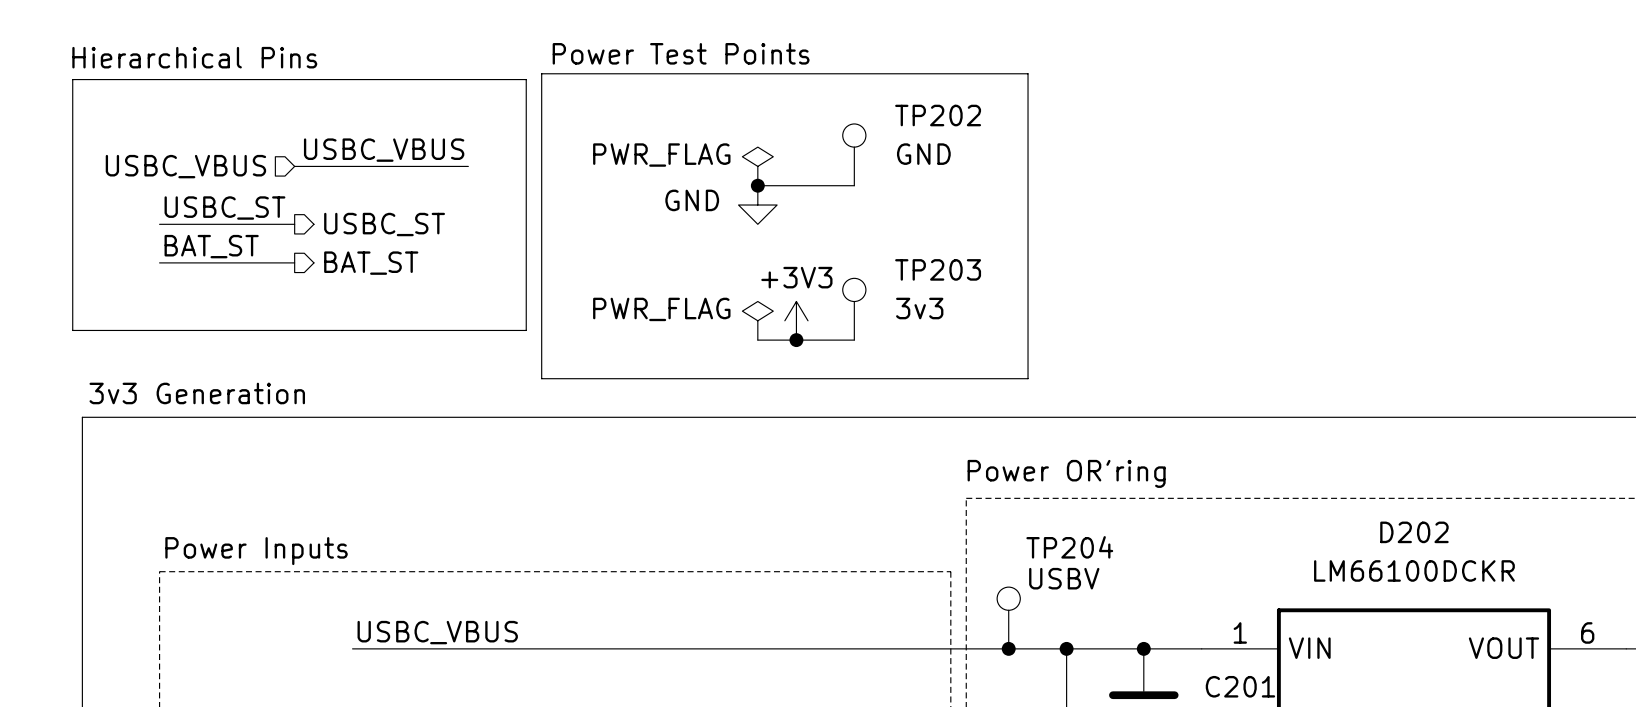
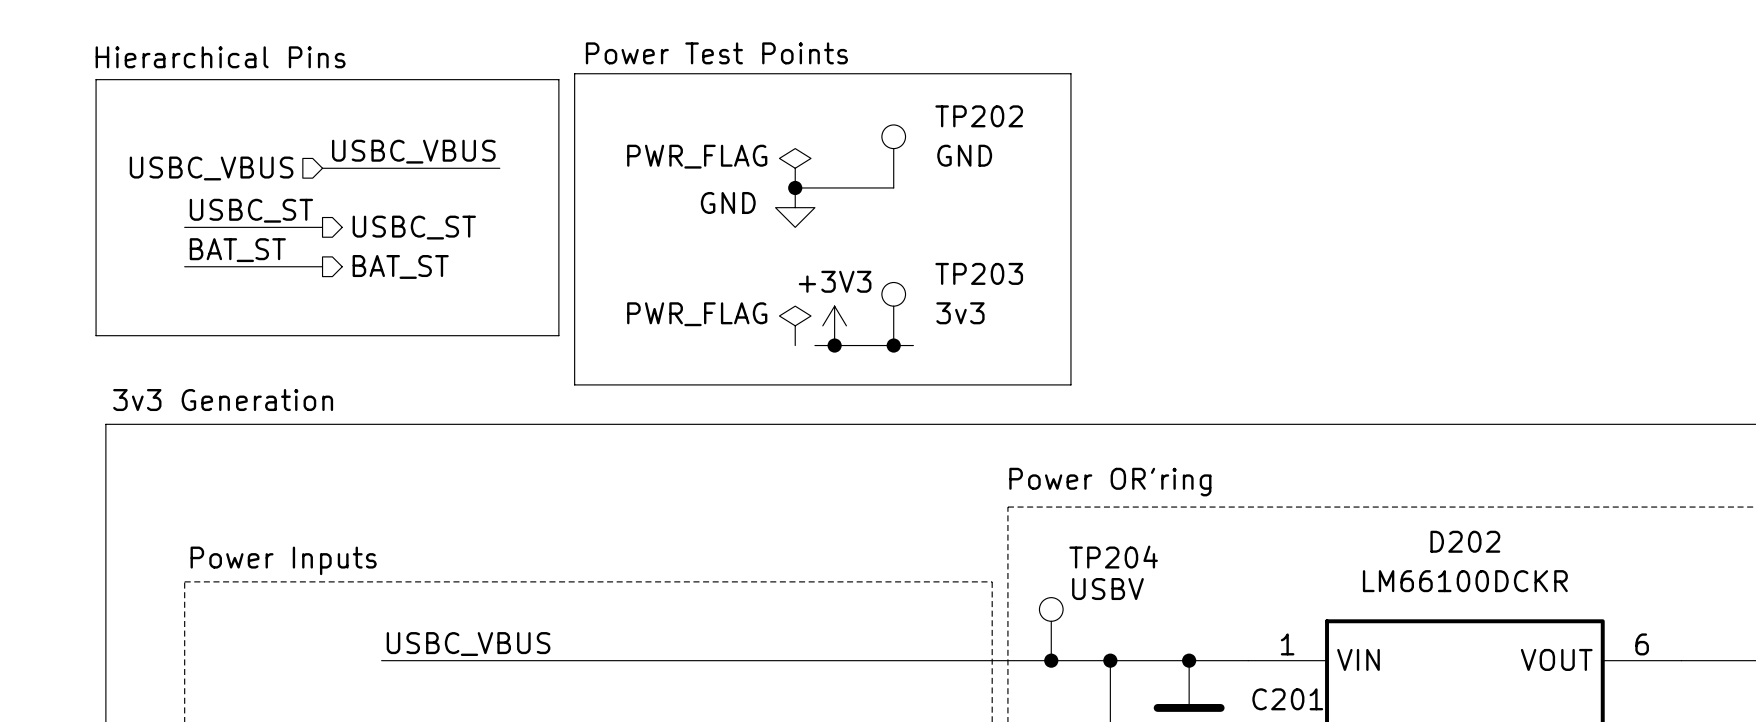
wire: (757, 340) (777, 340) -> (893, 345) (913, 345)
junction: none -> (893, 345)

